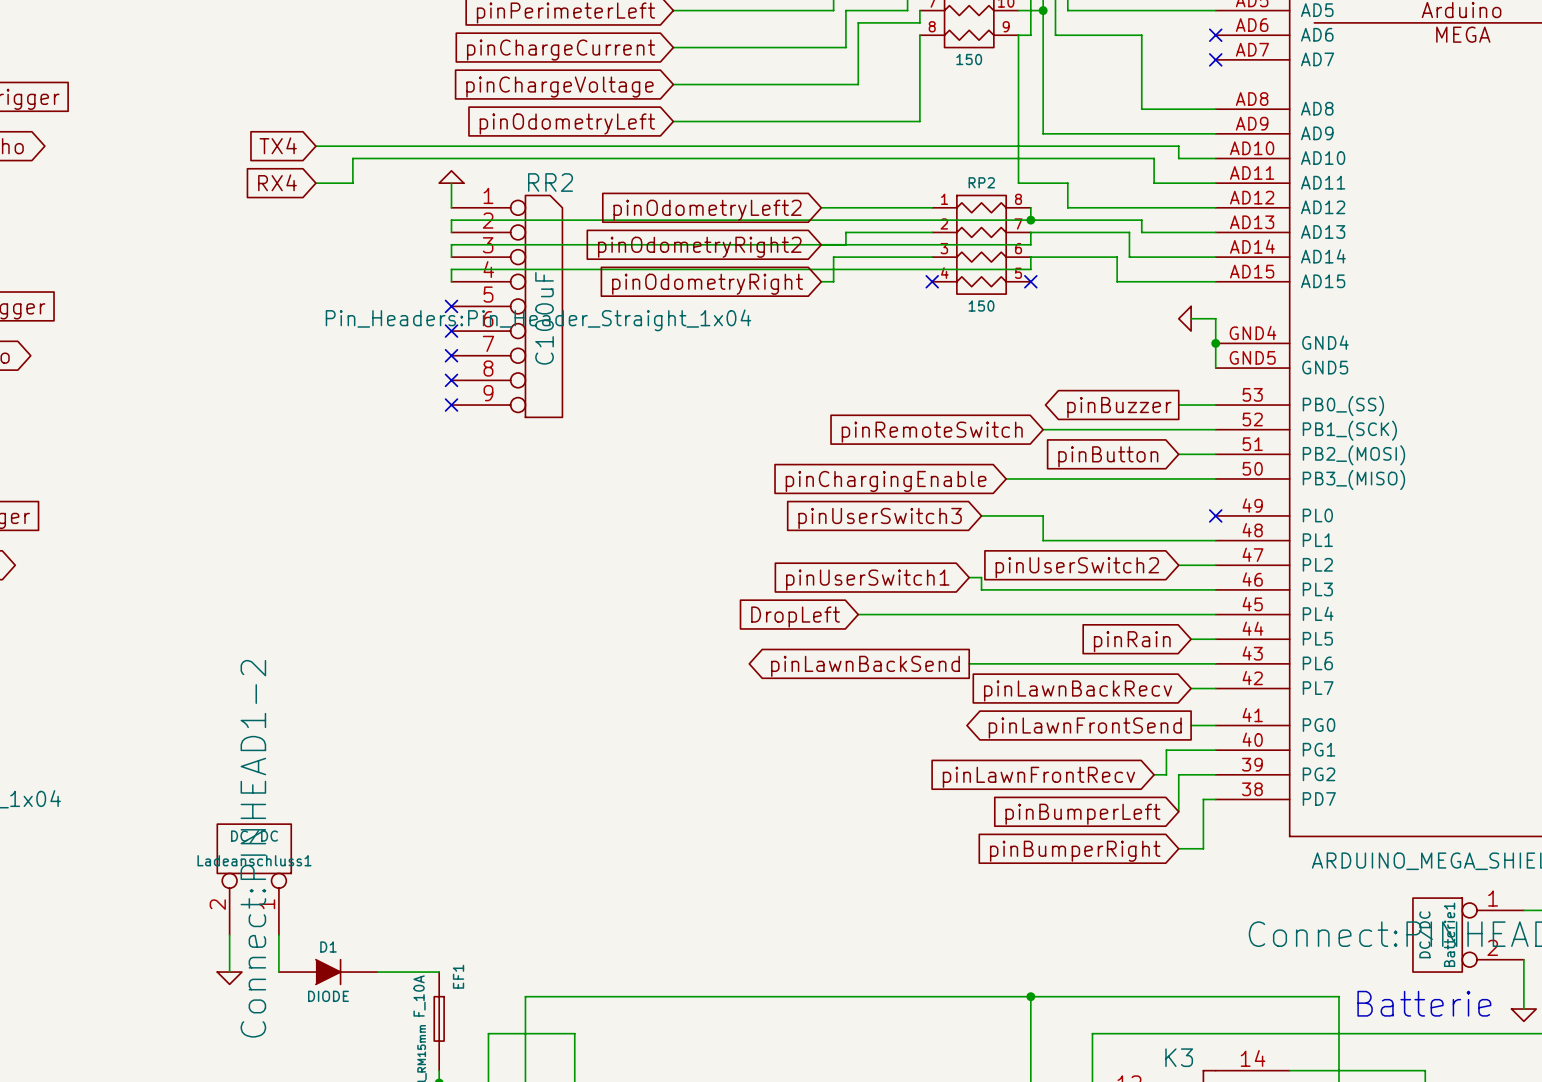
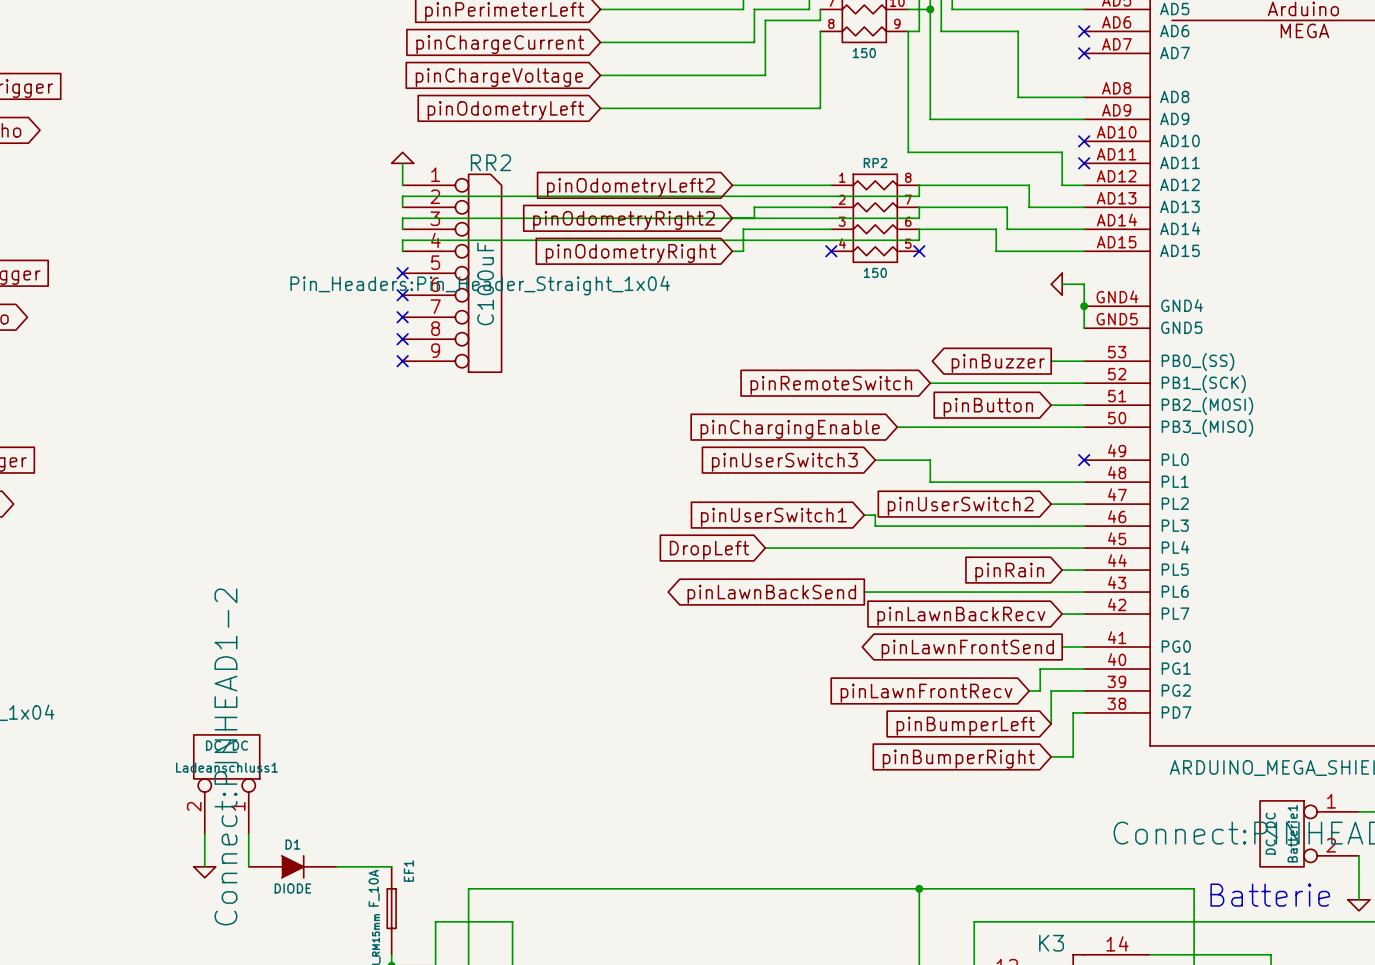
global label: TX4 (278, 145) -> none
wire: (315, 146) (1178, 146) (1178, 158) (1215, 158) -> none
no-connect mark: none -> (1084, 141)
wire: (1018, 170) (1018, 183) (1067, 183) (1067, 207) -> (919, 185) (952, 185)
wire: none -> (908, 152) (1062, 152) (1062, 185)
global label: RX4 (277, 182) -> none
wire: (315, 183) (352, 183) (352, 158) (1154, 158) (1154, 183) (1215, 183) -> none
no-connect mark: none -> (1084, 163)
wire: (1154, 207) (1191, 207) -> (1029, 185) (1029, 207)
wire: (1030, 220) (1141, 220) (1141, 232) (1154, 232) -> none
junction: (1030, 220) -> none

